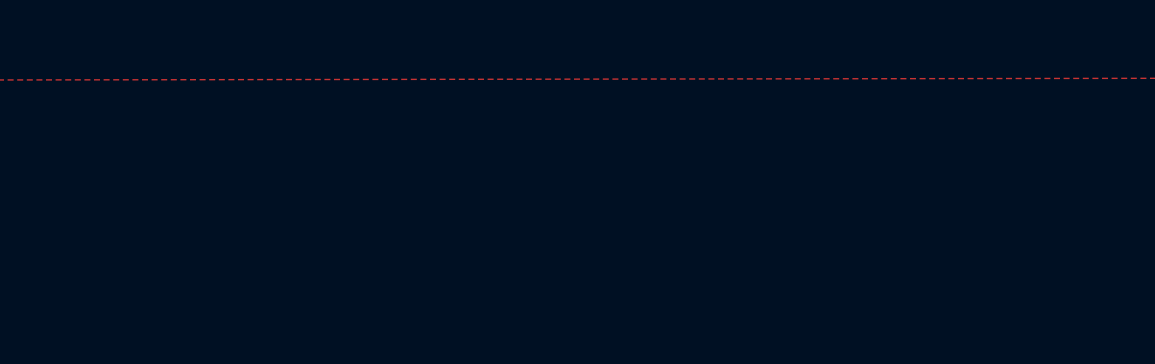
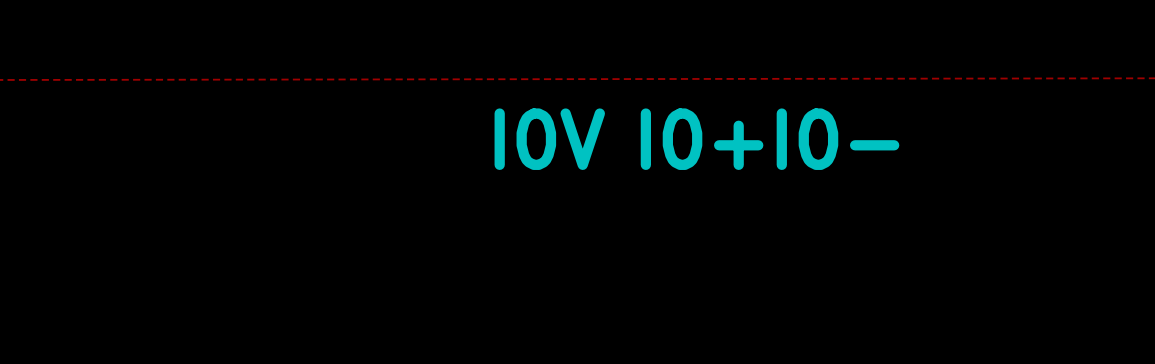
text: none -> I0V (549, 139)
text: none -> I0+ (702, 139)
text: none -> I0- (837, 139)

